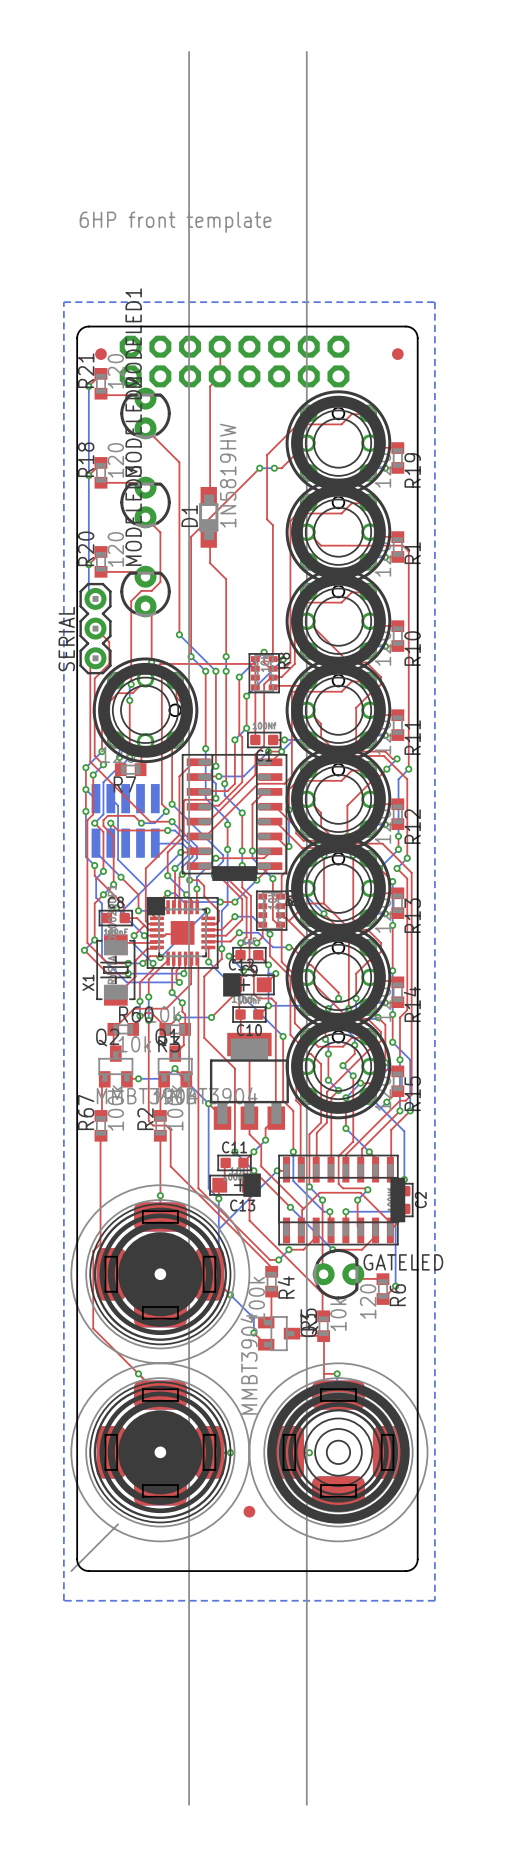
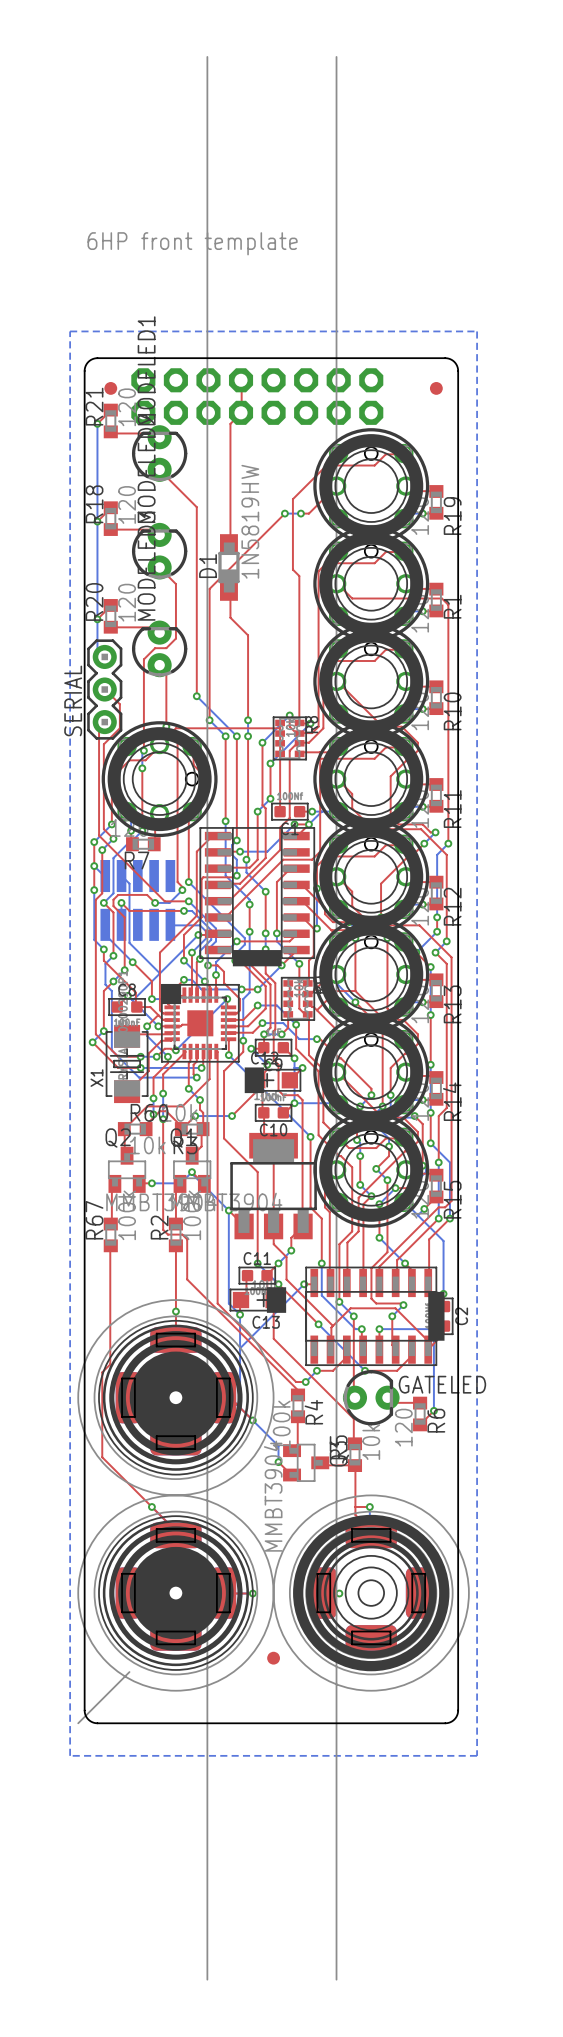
part footprint: [70, 1184, 251, 1365] -> [77, 1299, 275, 1497]
part footprint: [70, 1362, 251, 1543] -> [77, 1494, 275, 1692]
part footprint: [248, 1362, 429, 1542] -> [272, 1494, 470, 1692]

